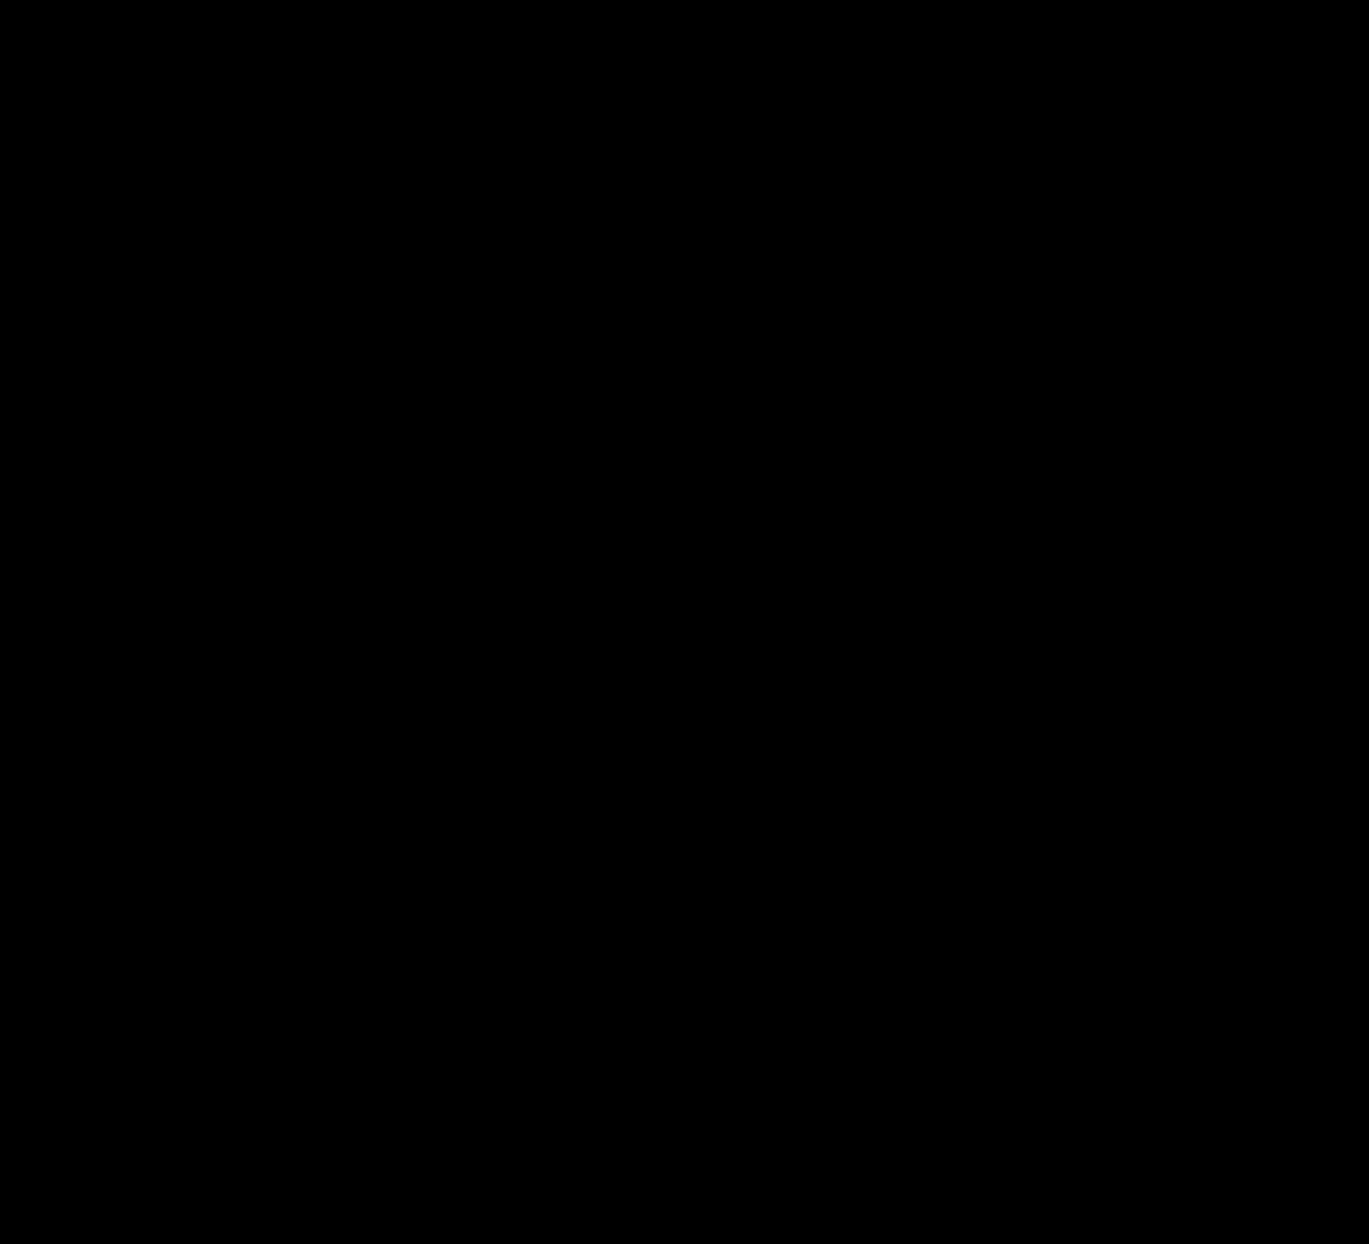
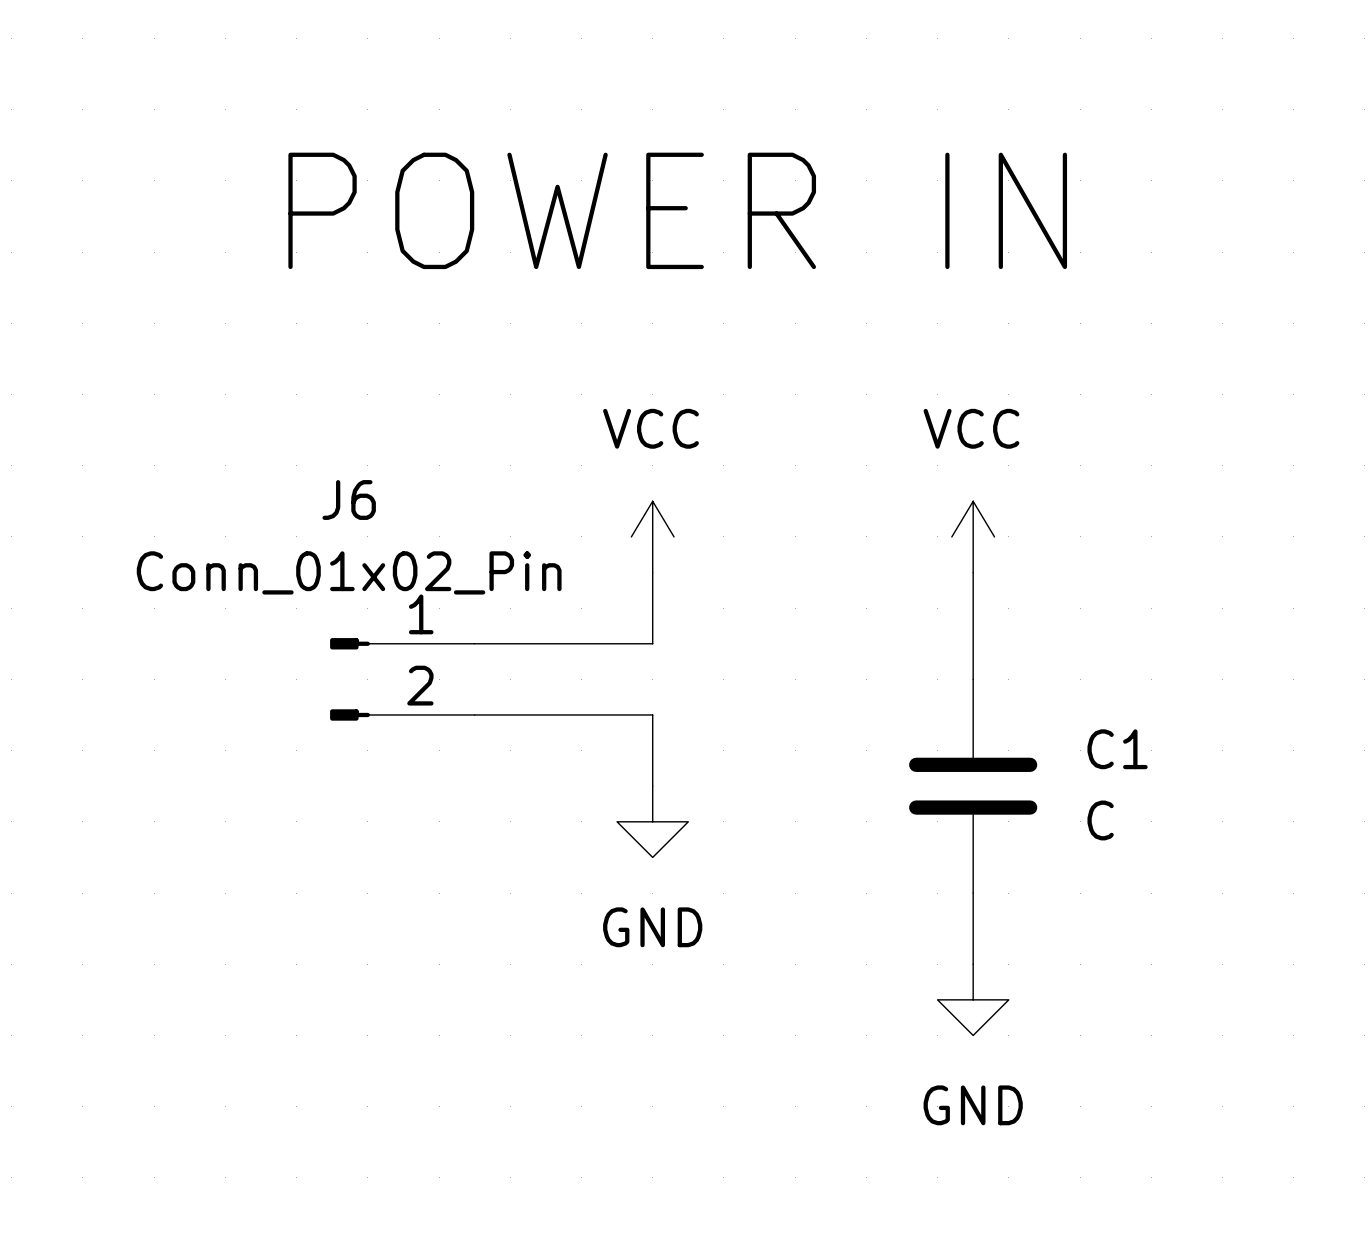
text: none -> POWER IN (677, 210)
power symbol: none -> VCC (652, 536)
power symbol: none -> VCC (973, 536)
wire: none -> (652, 572) (652, 643) (474, 643)
wire: none -> (973, 572) (973, 679)
J6: none -> Conn_01x02_Pin (402, 679)
wire: none -> (474, 714) (652, 714) (652, 786)
C1: none -> C (973, 786)
power symbol: none -> GND (652, 821)
wire: none -> (973, 893) (973, 964)
power symbol: none -> GND (973, 999)

